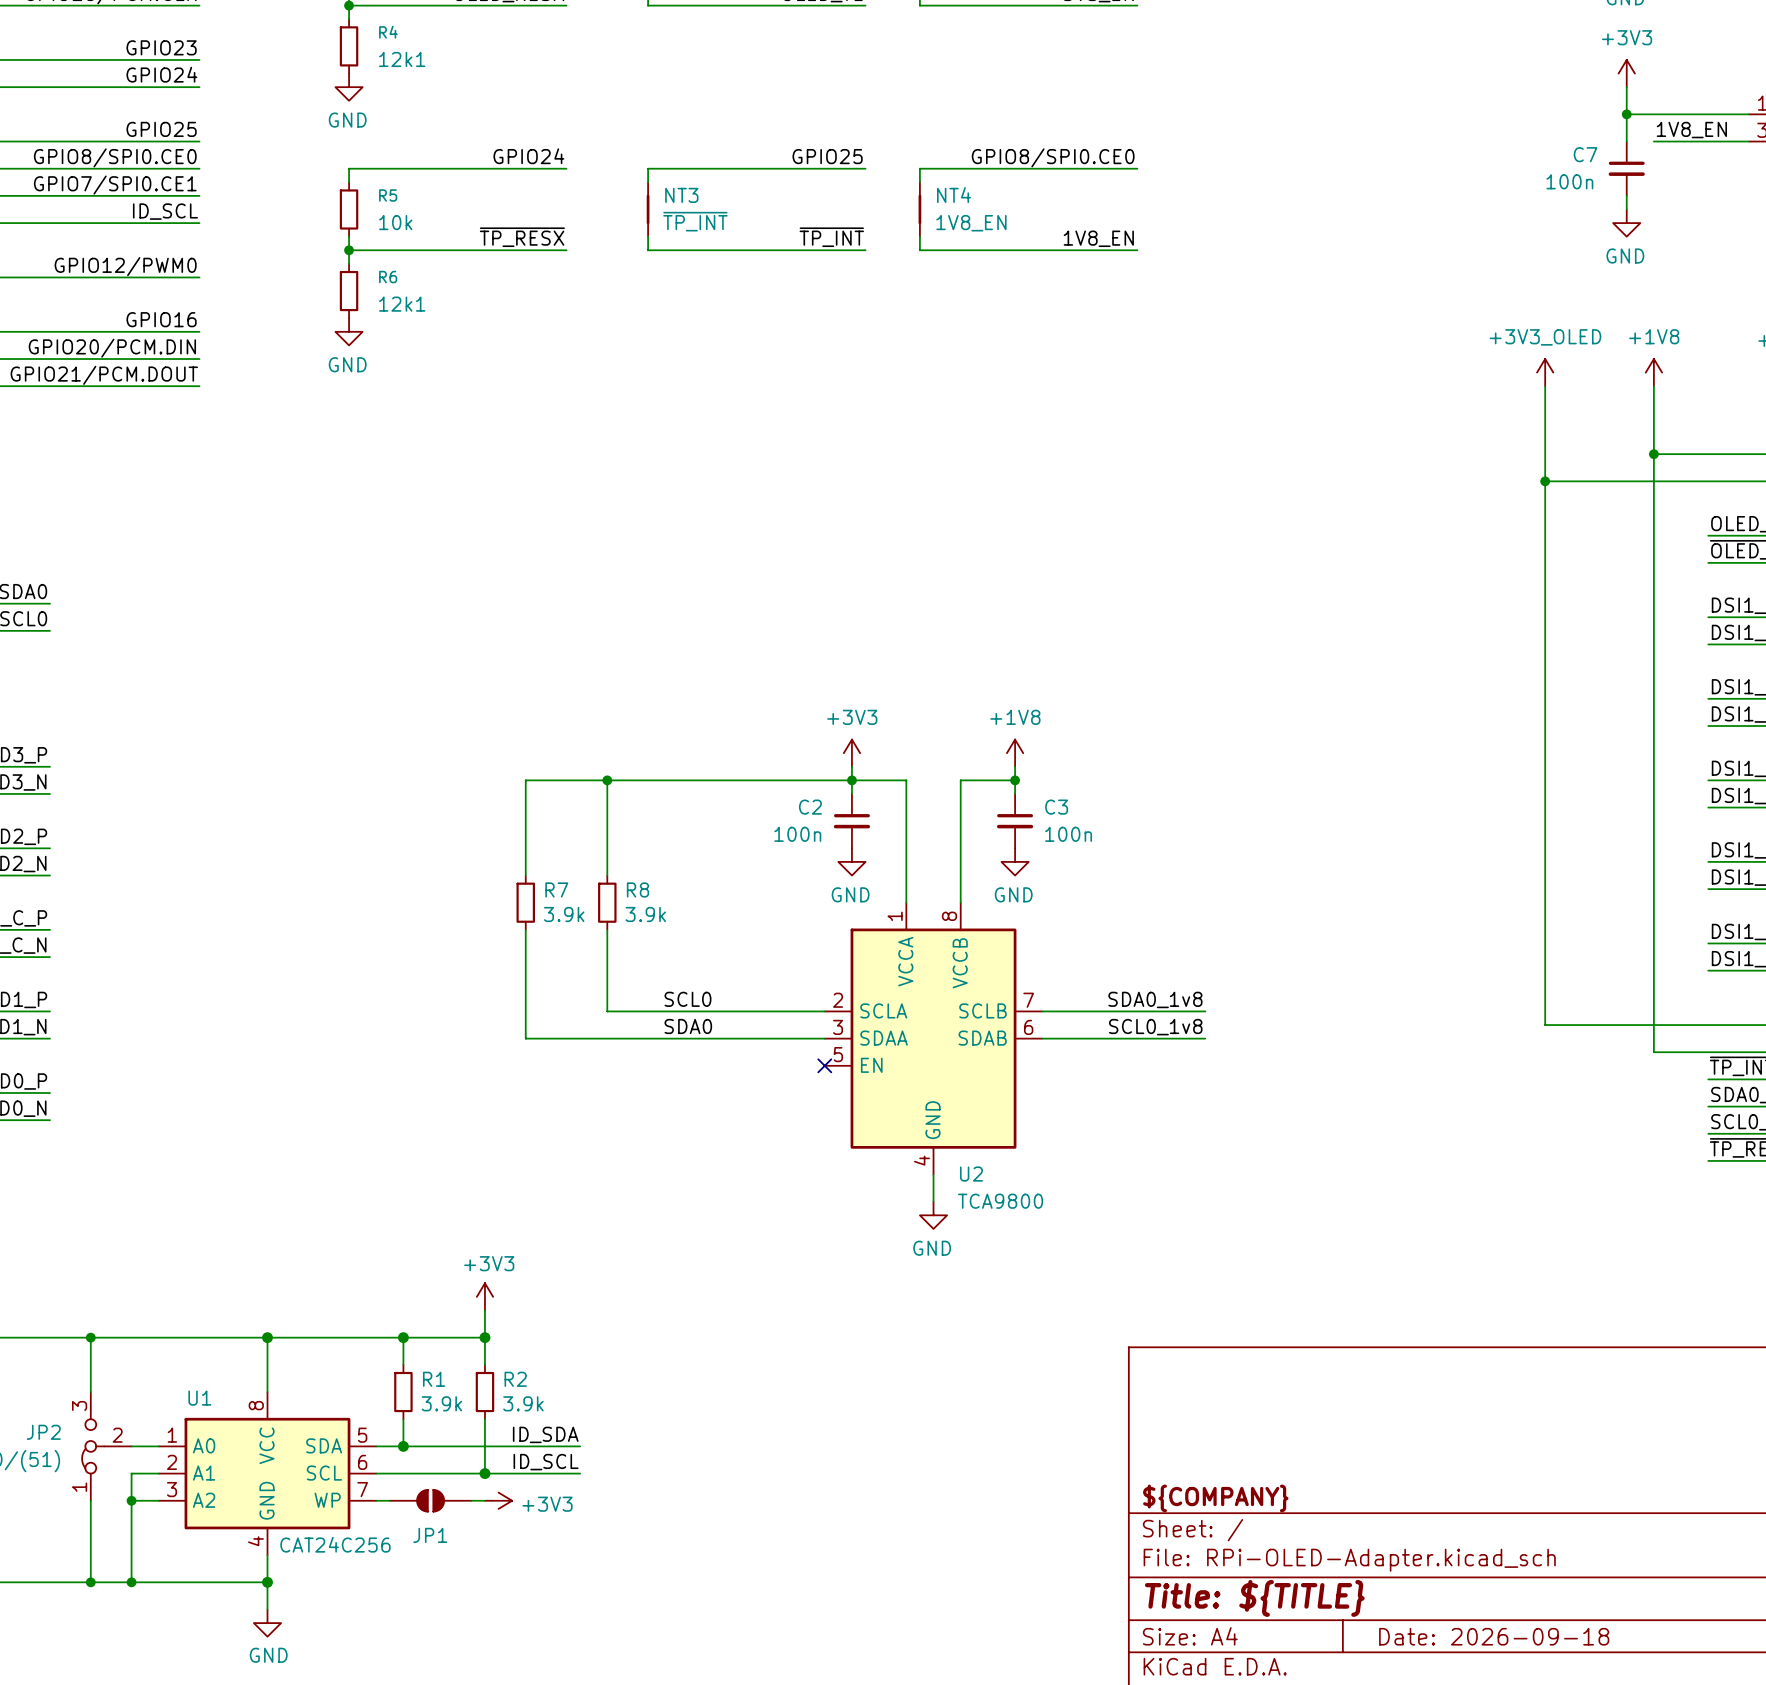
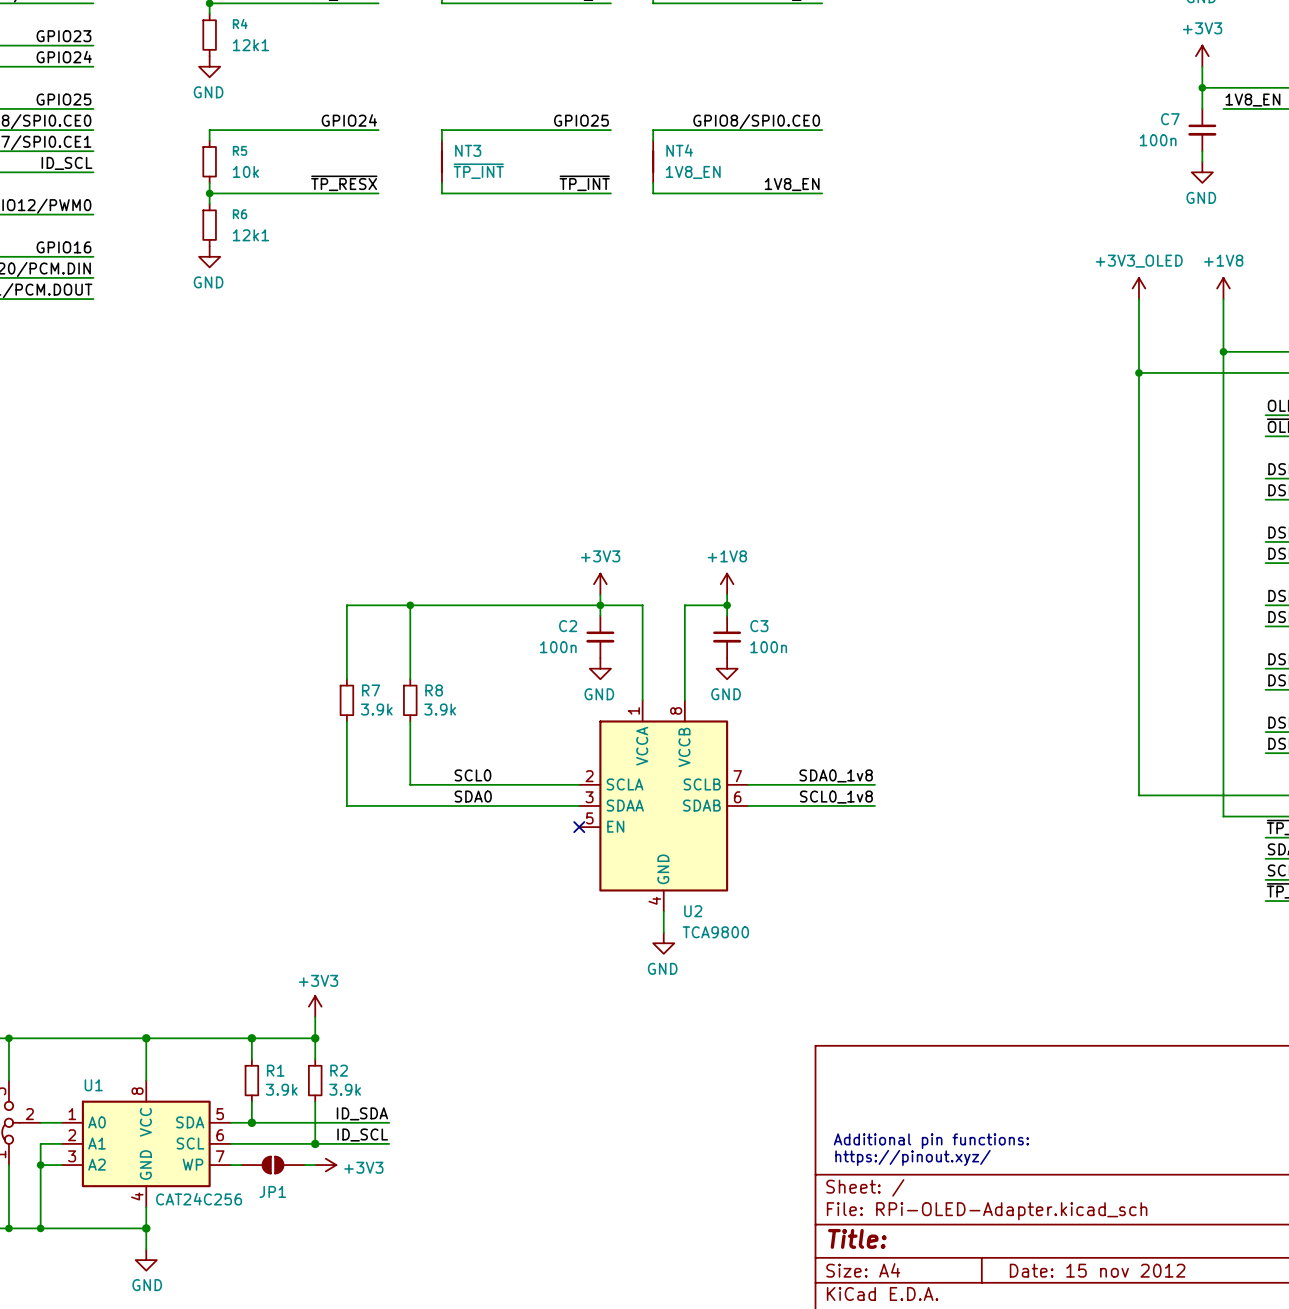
text: none -> Additional pin functions: (931, 1141)
text: none -> https://pinout.xyz/ (913, 1157)
title block: ${COMPANY} (1215, 1498) -> none
title block: Title: ${TITLE} (1254, 1598) -> Title: (857, 1238)
title block: Date: 2026-09-18 (1494, 1636) -> Date: 15 nov 2012 (1097, 1270)

